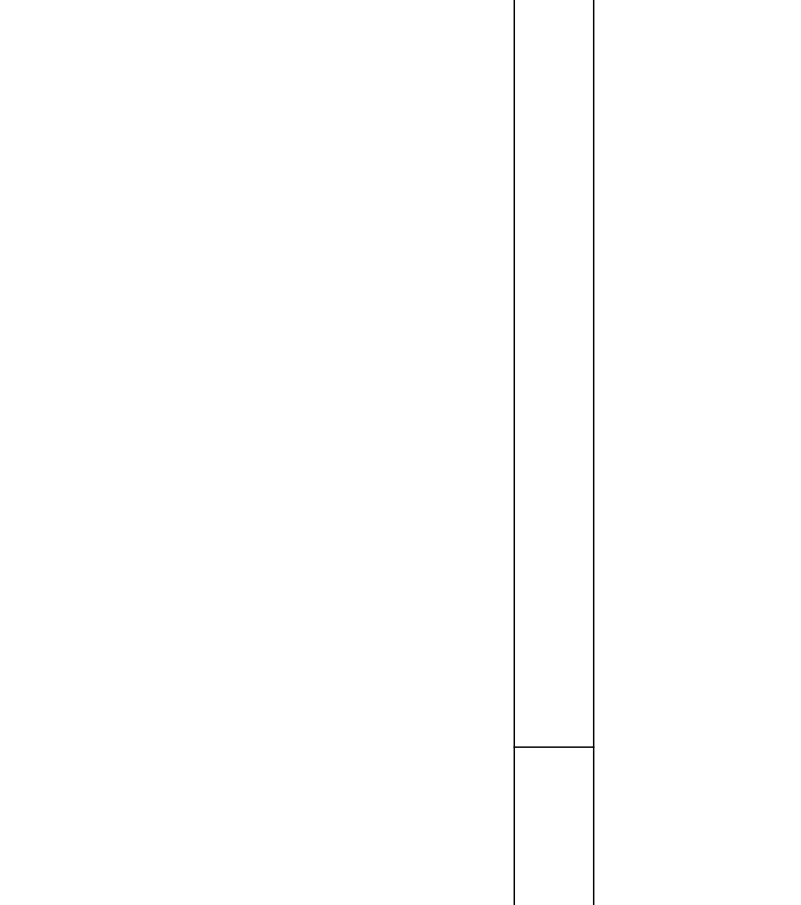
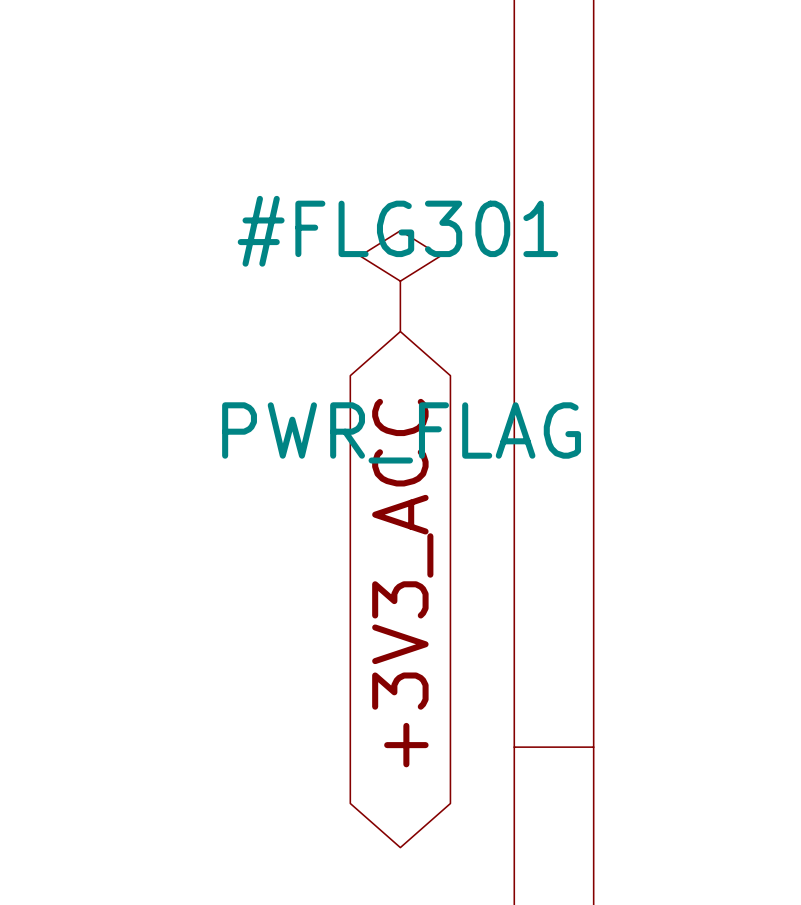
#FLG301: none -> PWR_FLAG (400, 281)
global label: none -> +3V3_ACC (402, 583)

